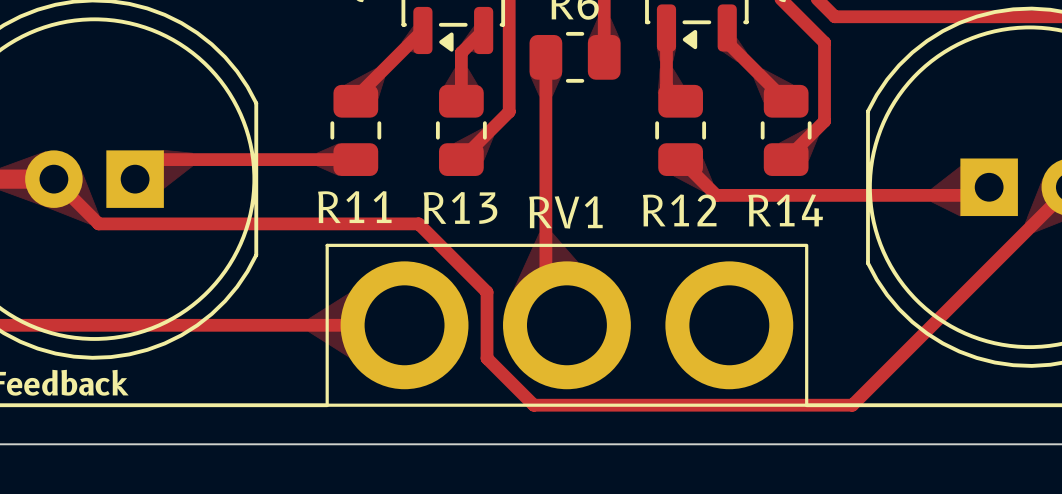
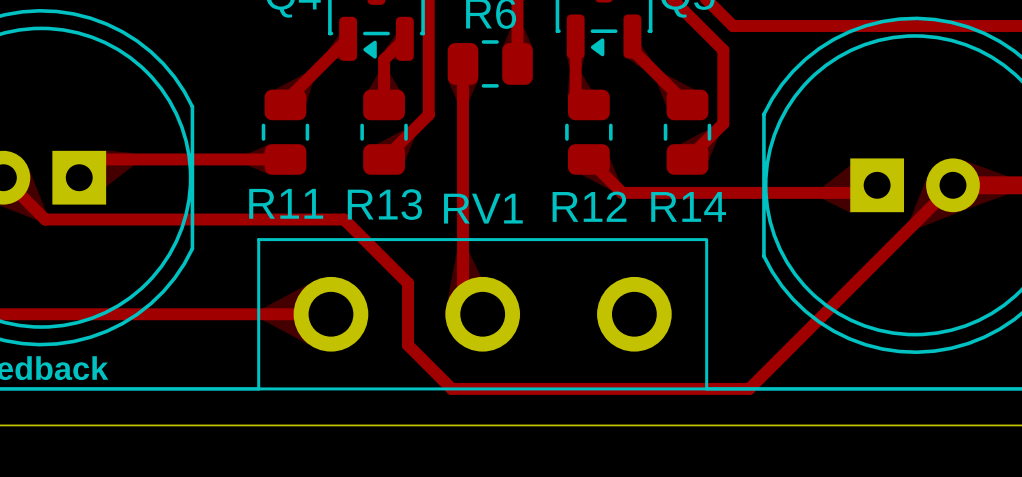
RV1 footprint: [325, 243, 809, 407] -> [257, 238, 709, 391]

